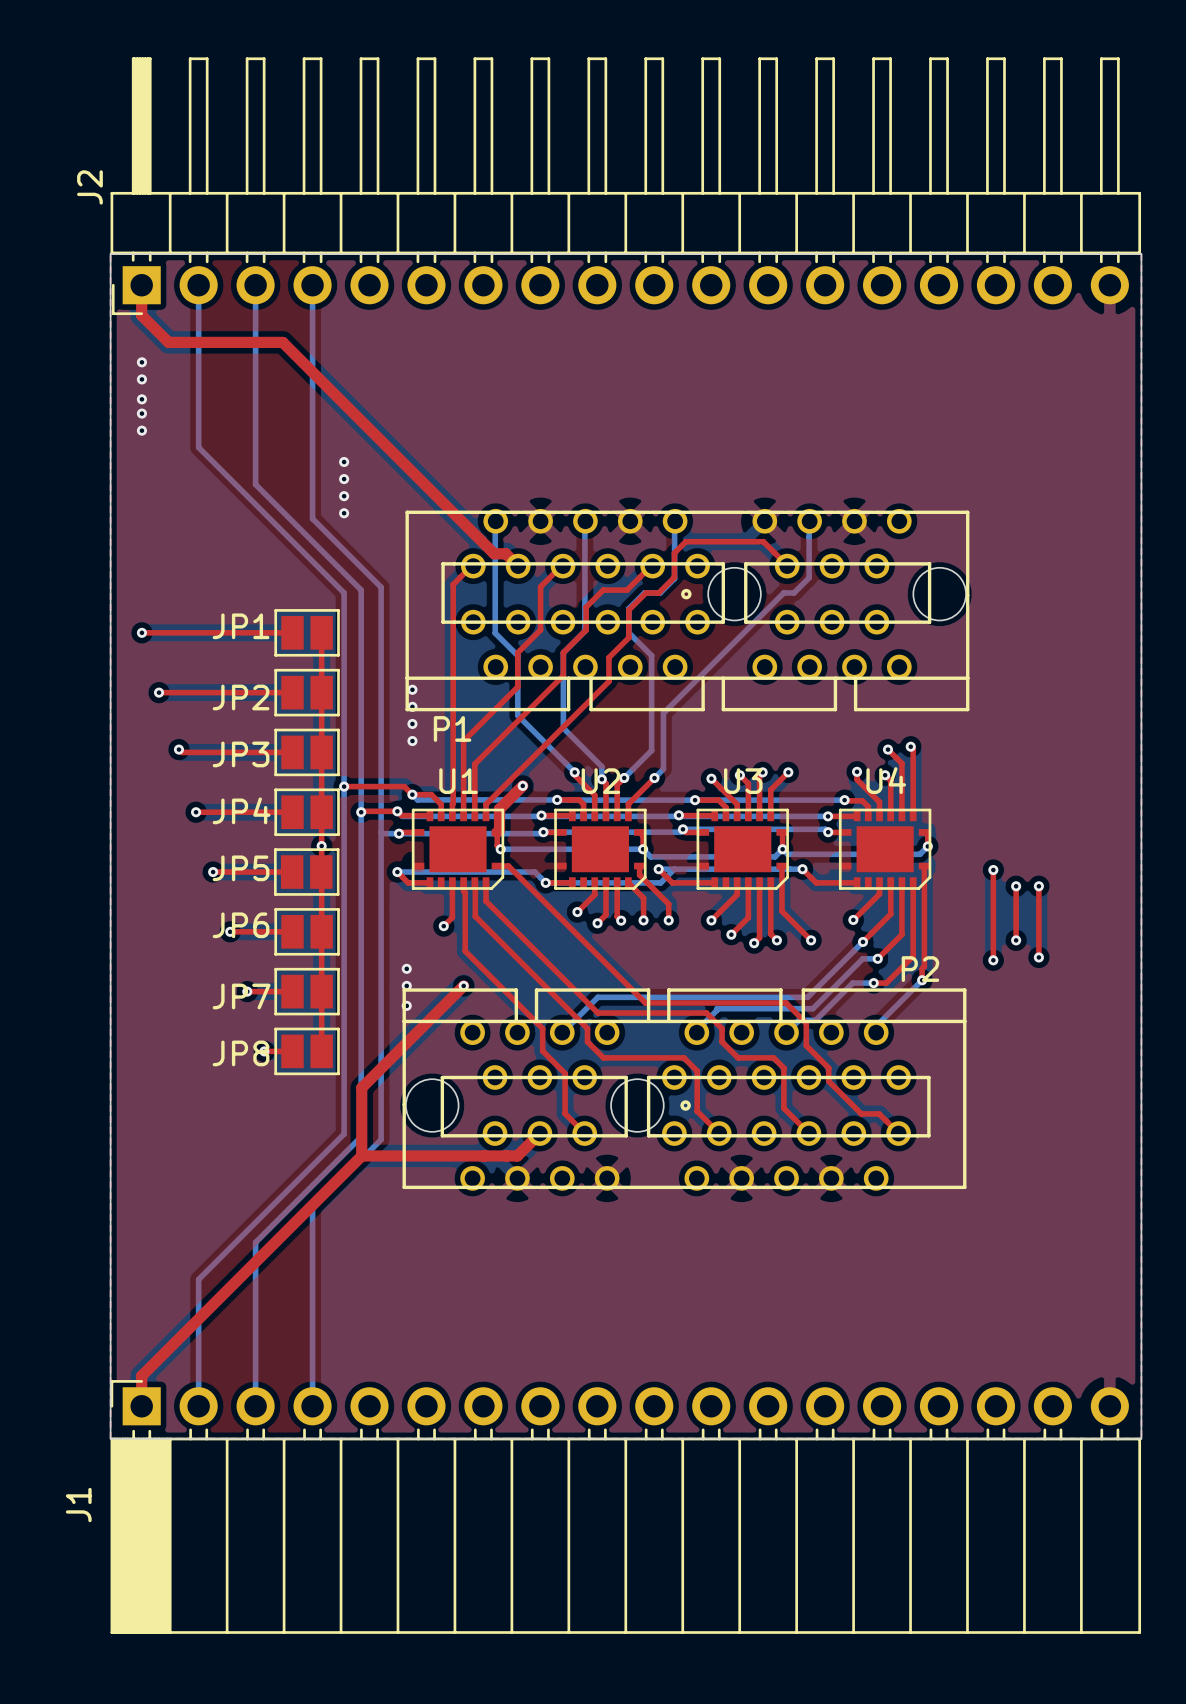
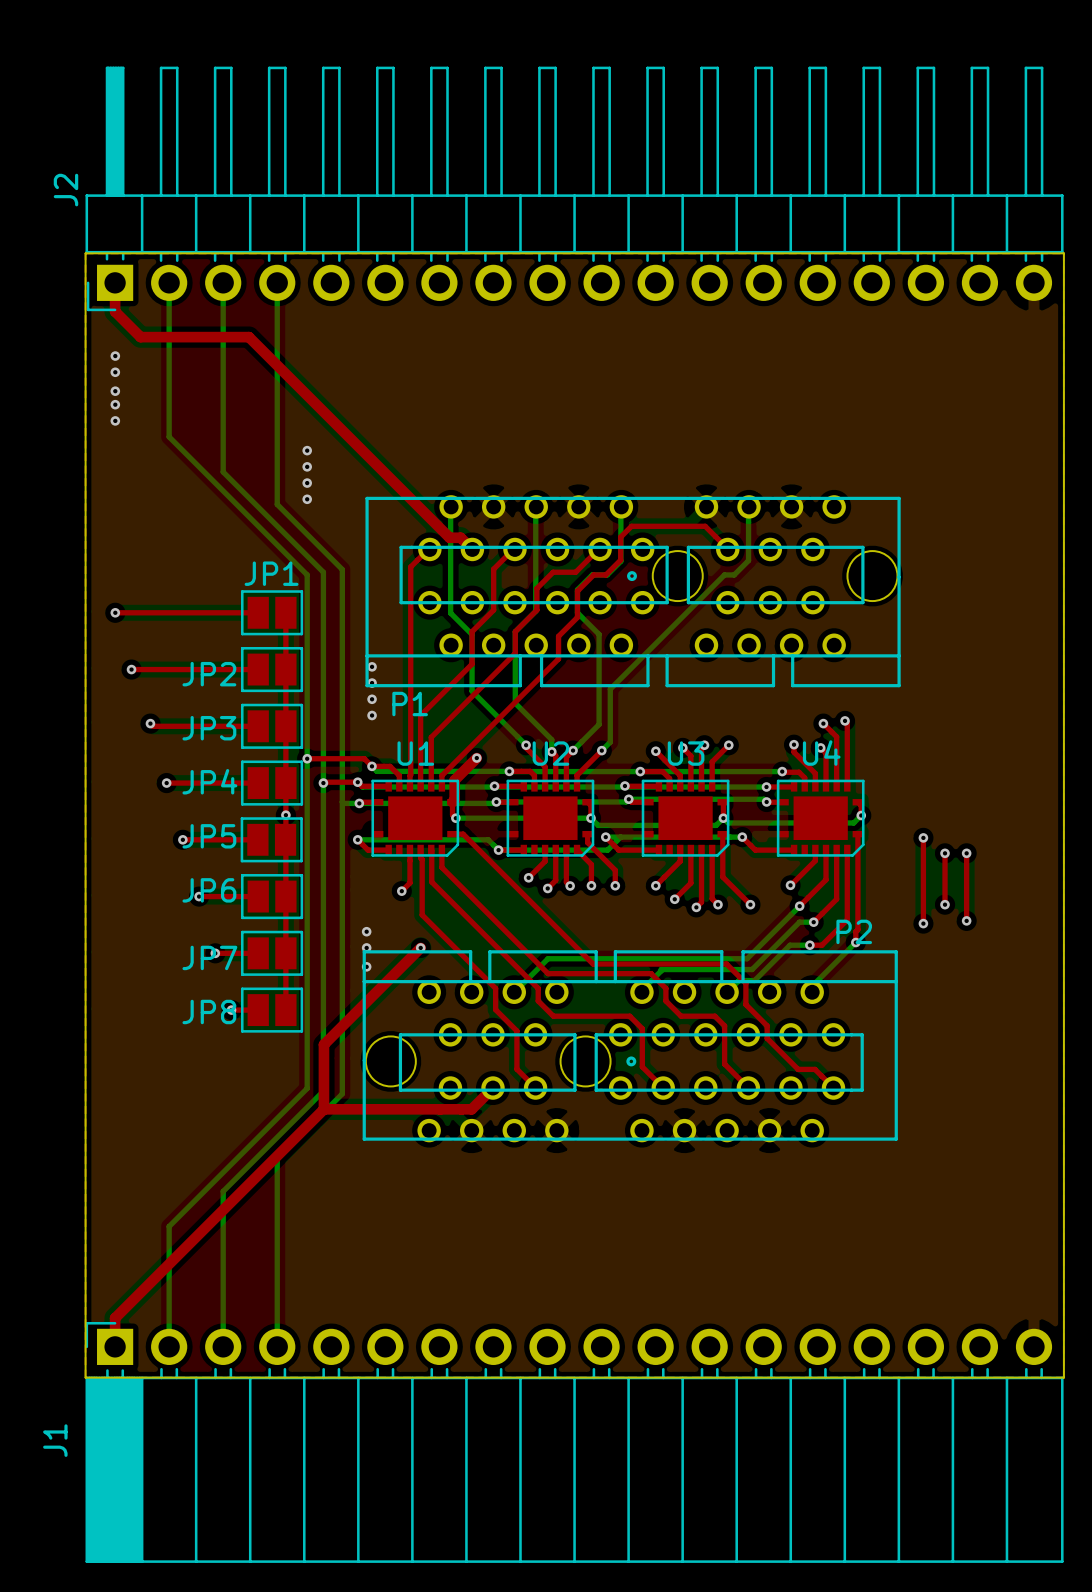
JP1 name position: JP1 (241, 626) -> JP1 (271, 573)

